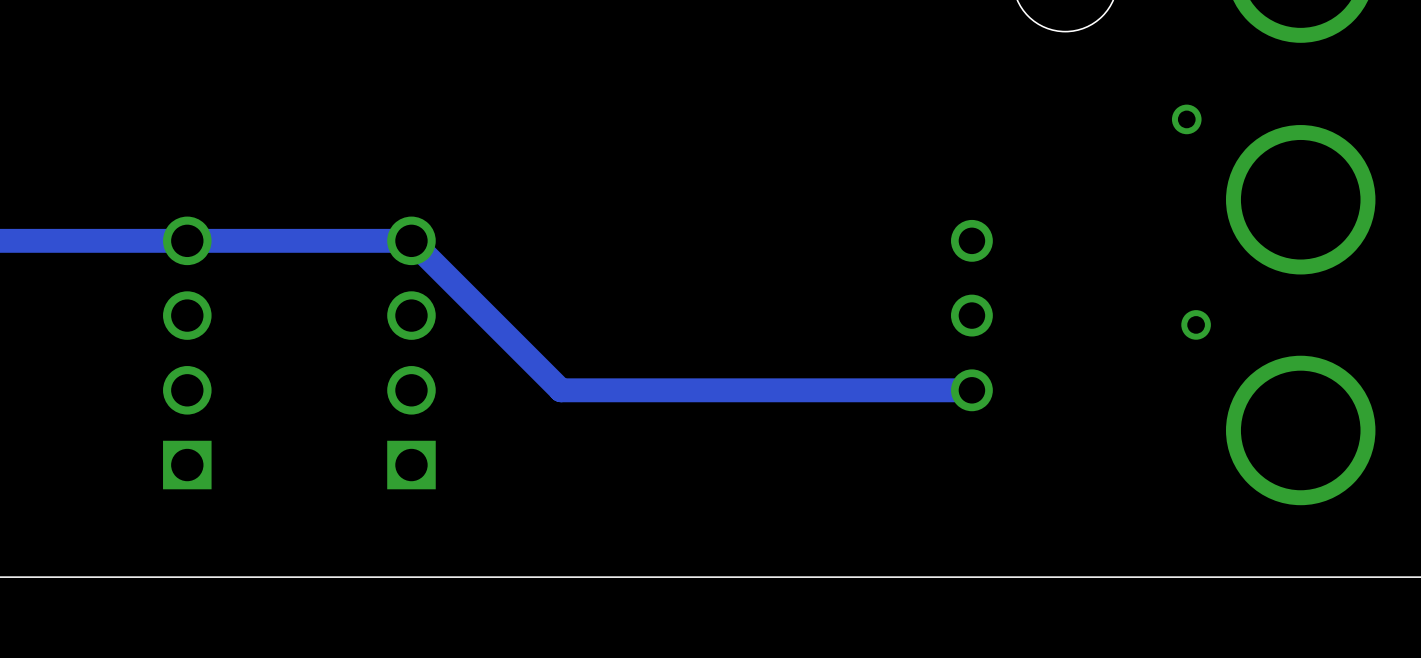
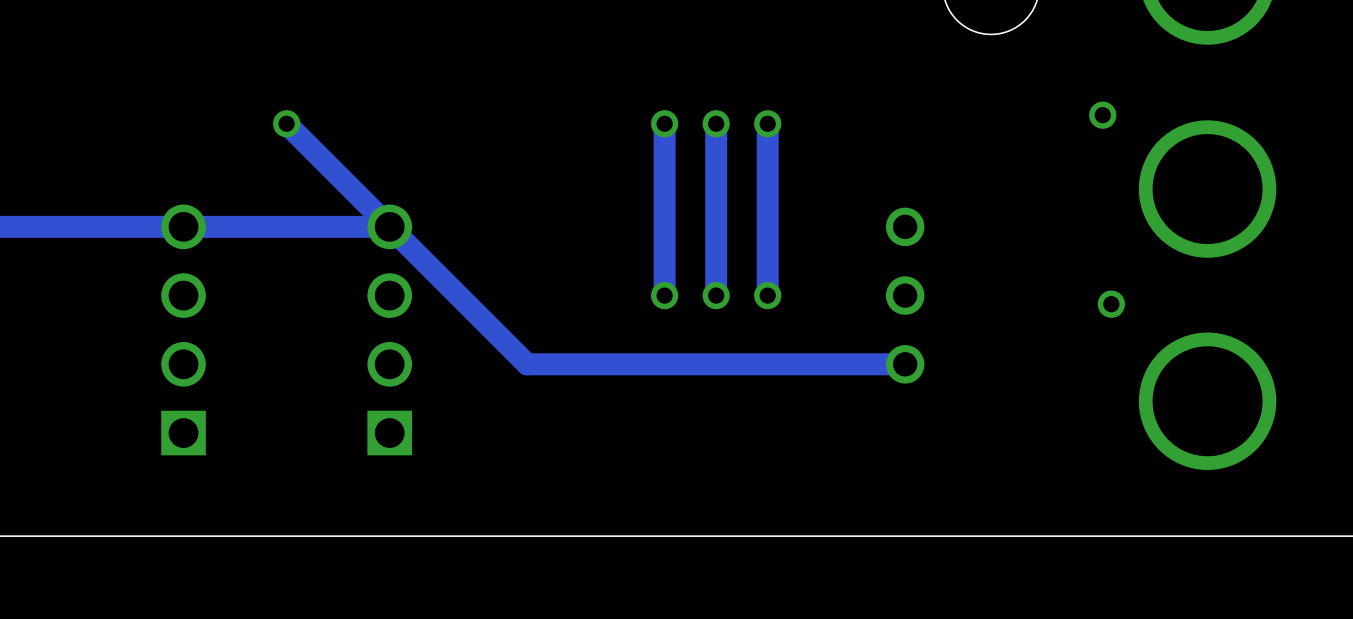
track: none -> (286, 123) (389, 226)
via: none -> (286, 123)
track: none -> (664, 123) (664, 295)
via: none -> (664, 123)
track: none -> (716, 123) (716, 295)
via: none -> (716, 123)
track: none -> (767, 123) (767, 295)
via: none -> (767, 123)
via: none -> (664, 295)
via: none -> (716, 295)
via: none -> (767, 295)

